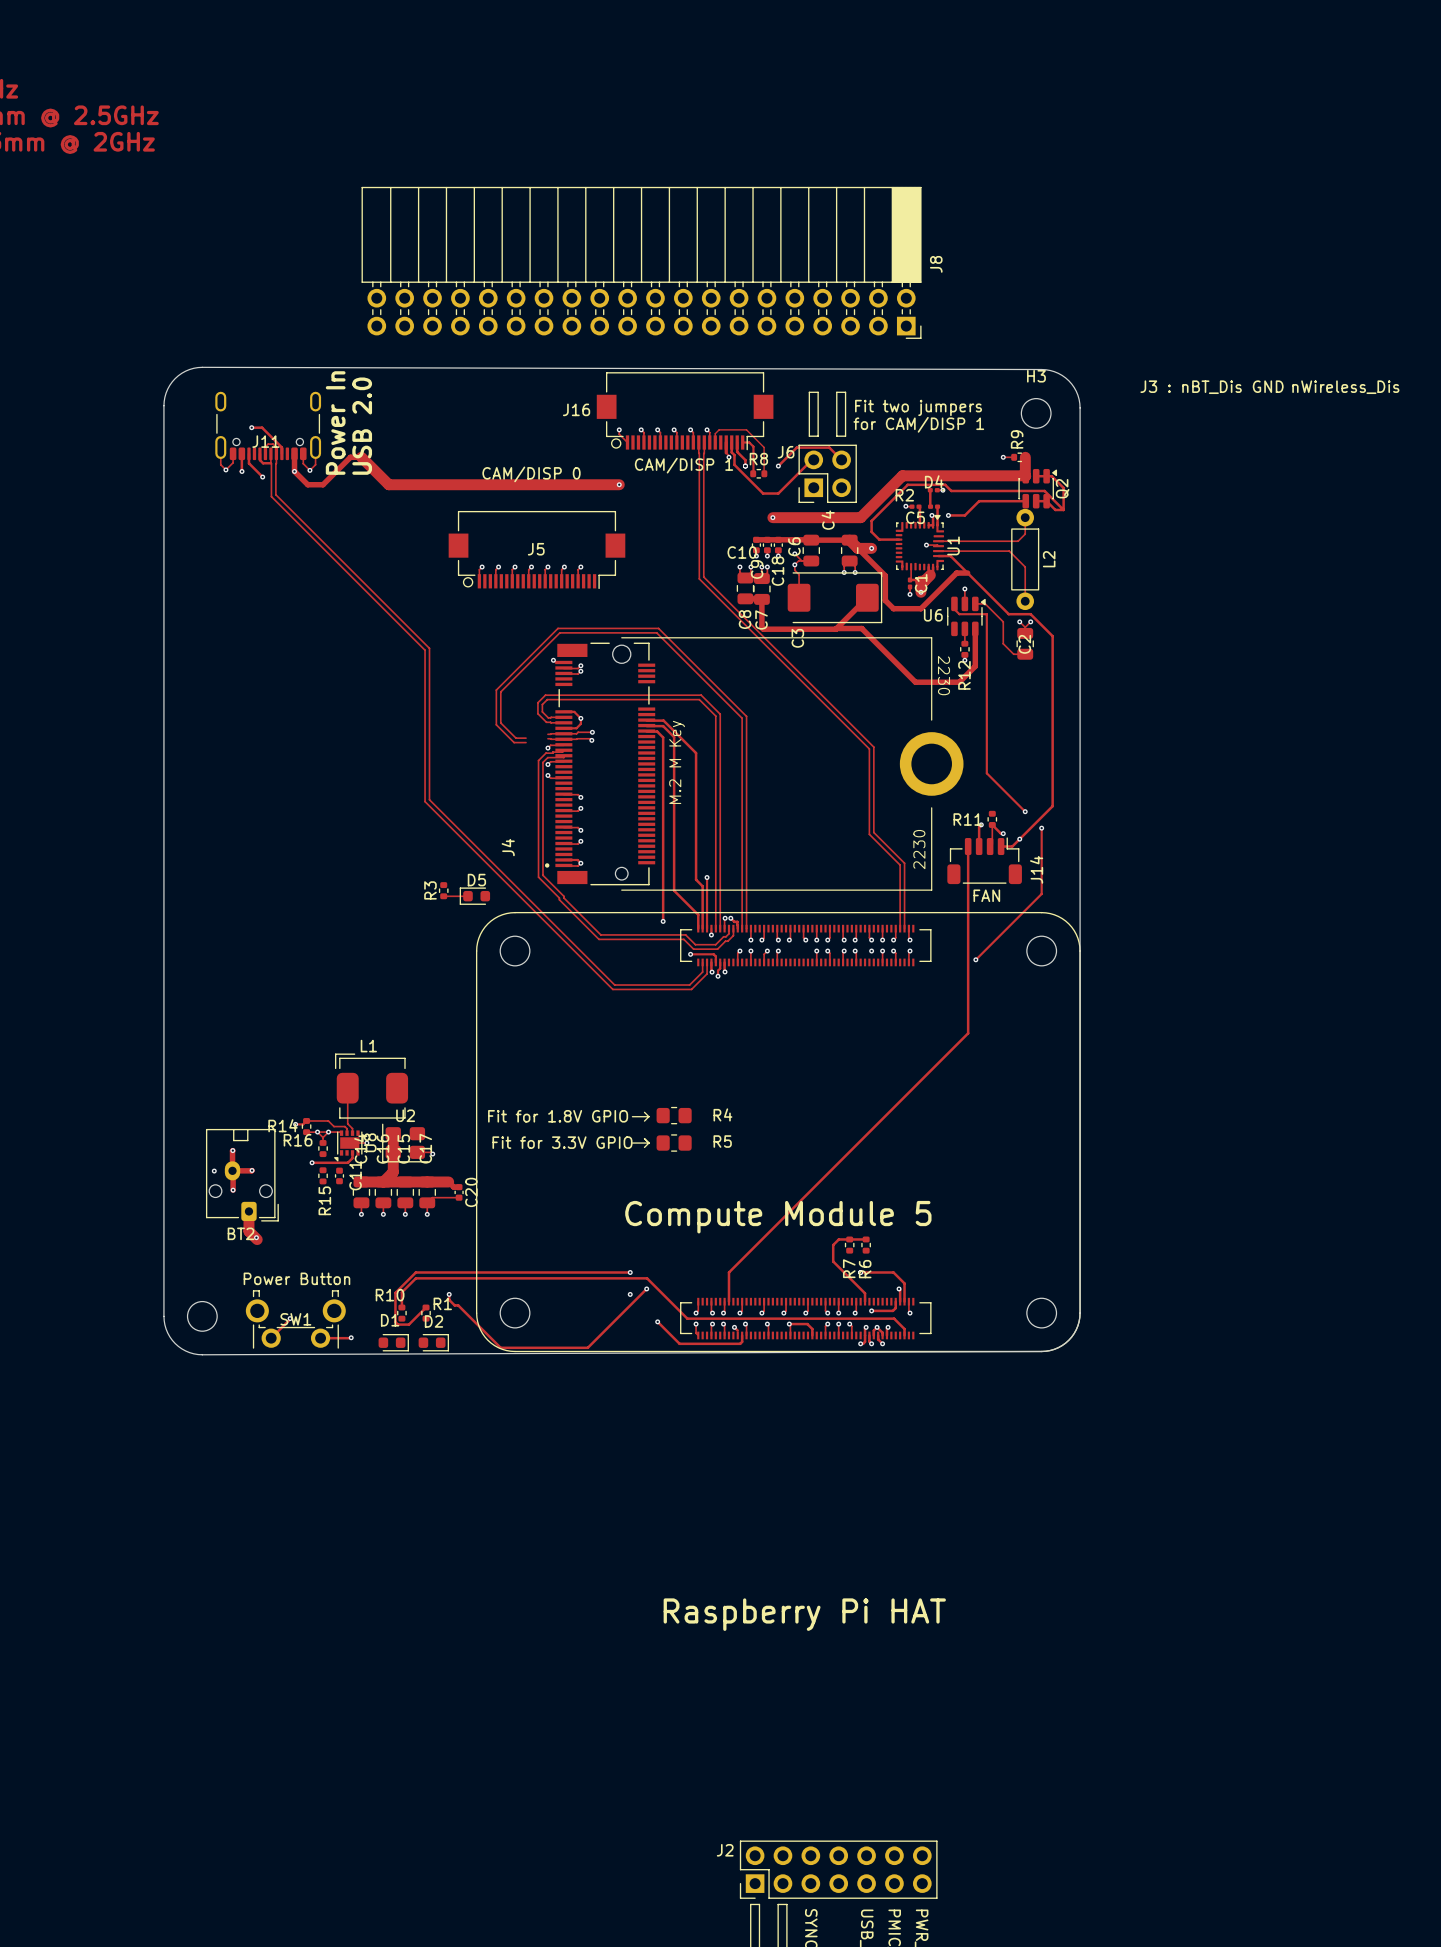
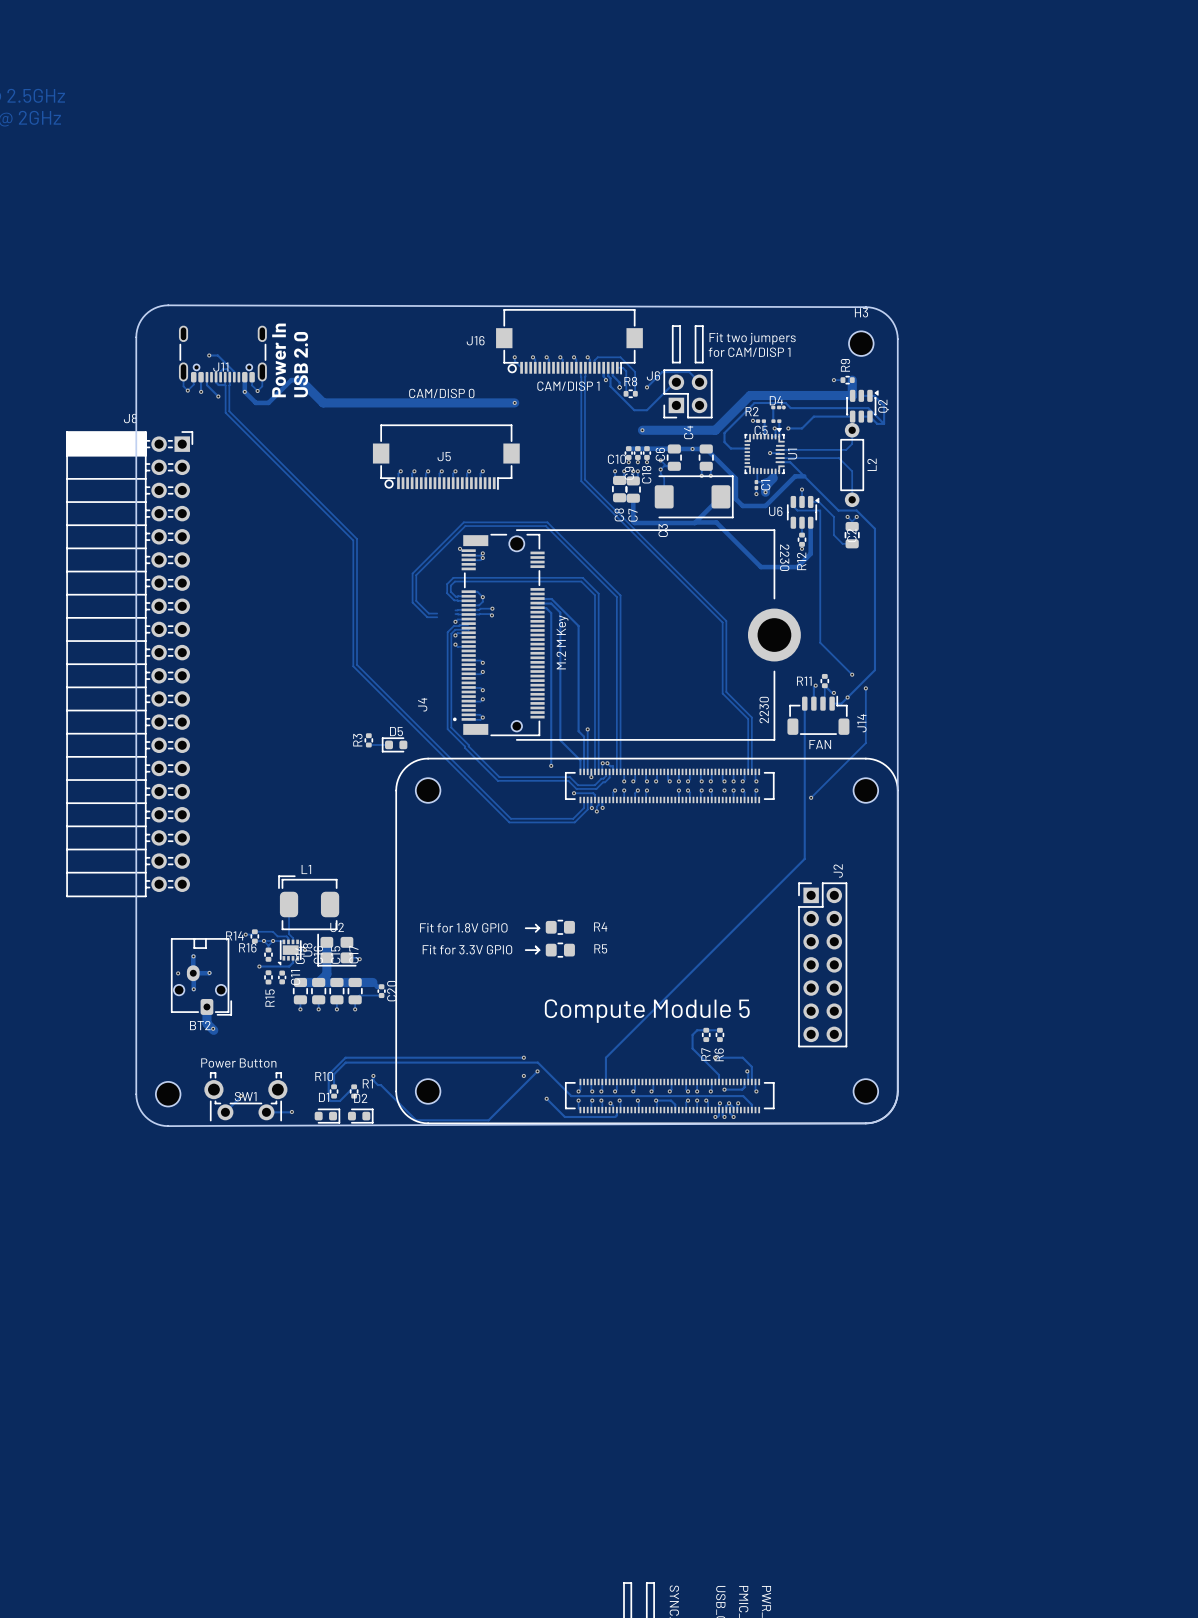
J8 rotation: 0° (641, 262) -> 90° counterclockwise (129, 664)
J8 position: (641, 262) -> (129, 664)
text: J3 : nBT_Dis GND (1212, 387) -> none
text: nWireless_Dis (1345, 387) -> none
track: (849, 540) (857, 548) (871, 548) -> none
via position: (871, 548) -> (692, 448)
text: Raspberry Pi HAT (804, 1614) -> none
J2 rotation: 0° (838, 1869) -> 90° clockwise (822, 964)
J2 position: (838, 1869) -> (822, 964)

